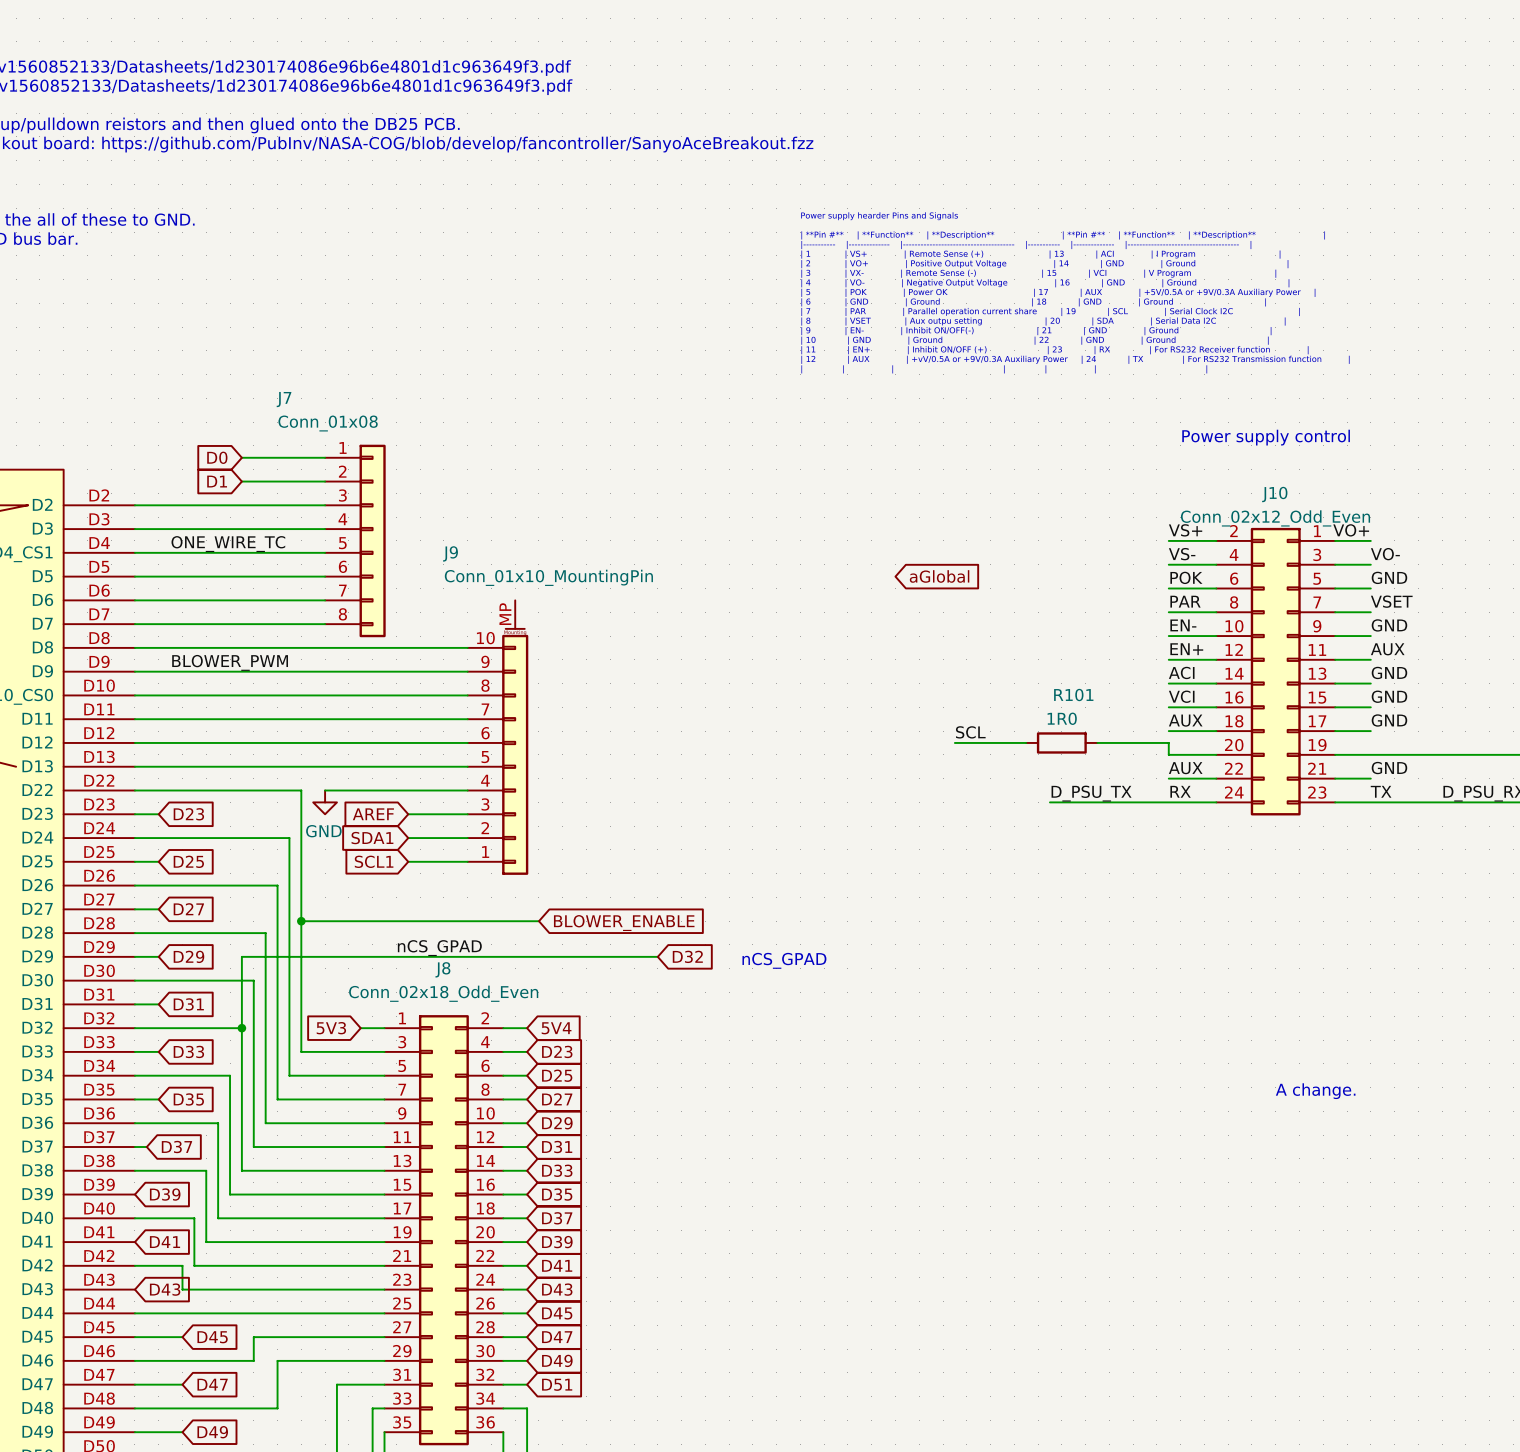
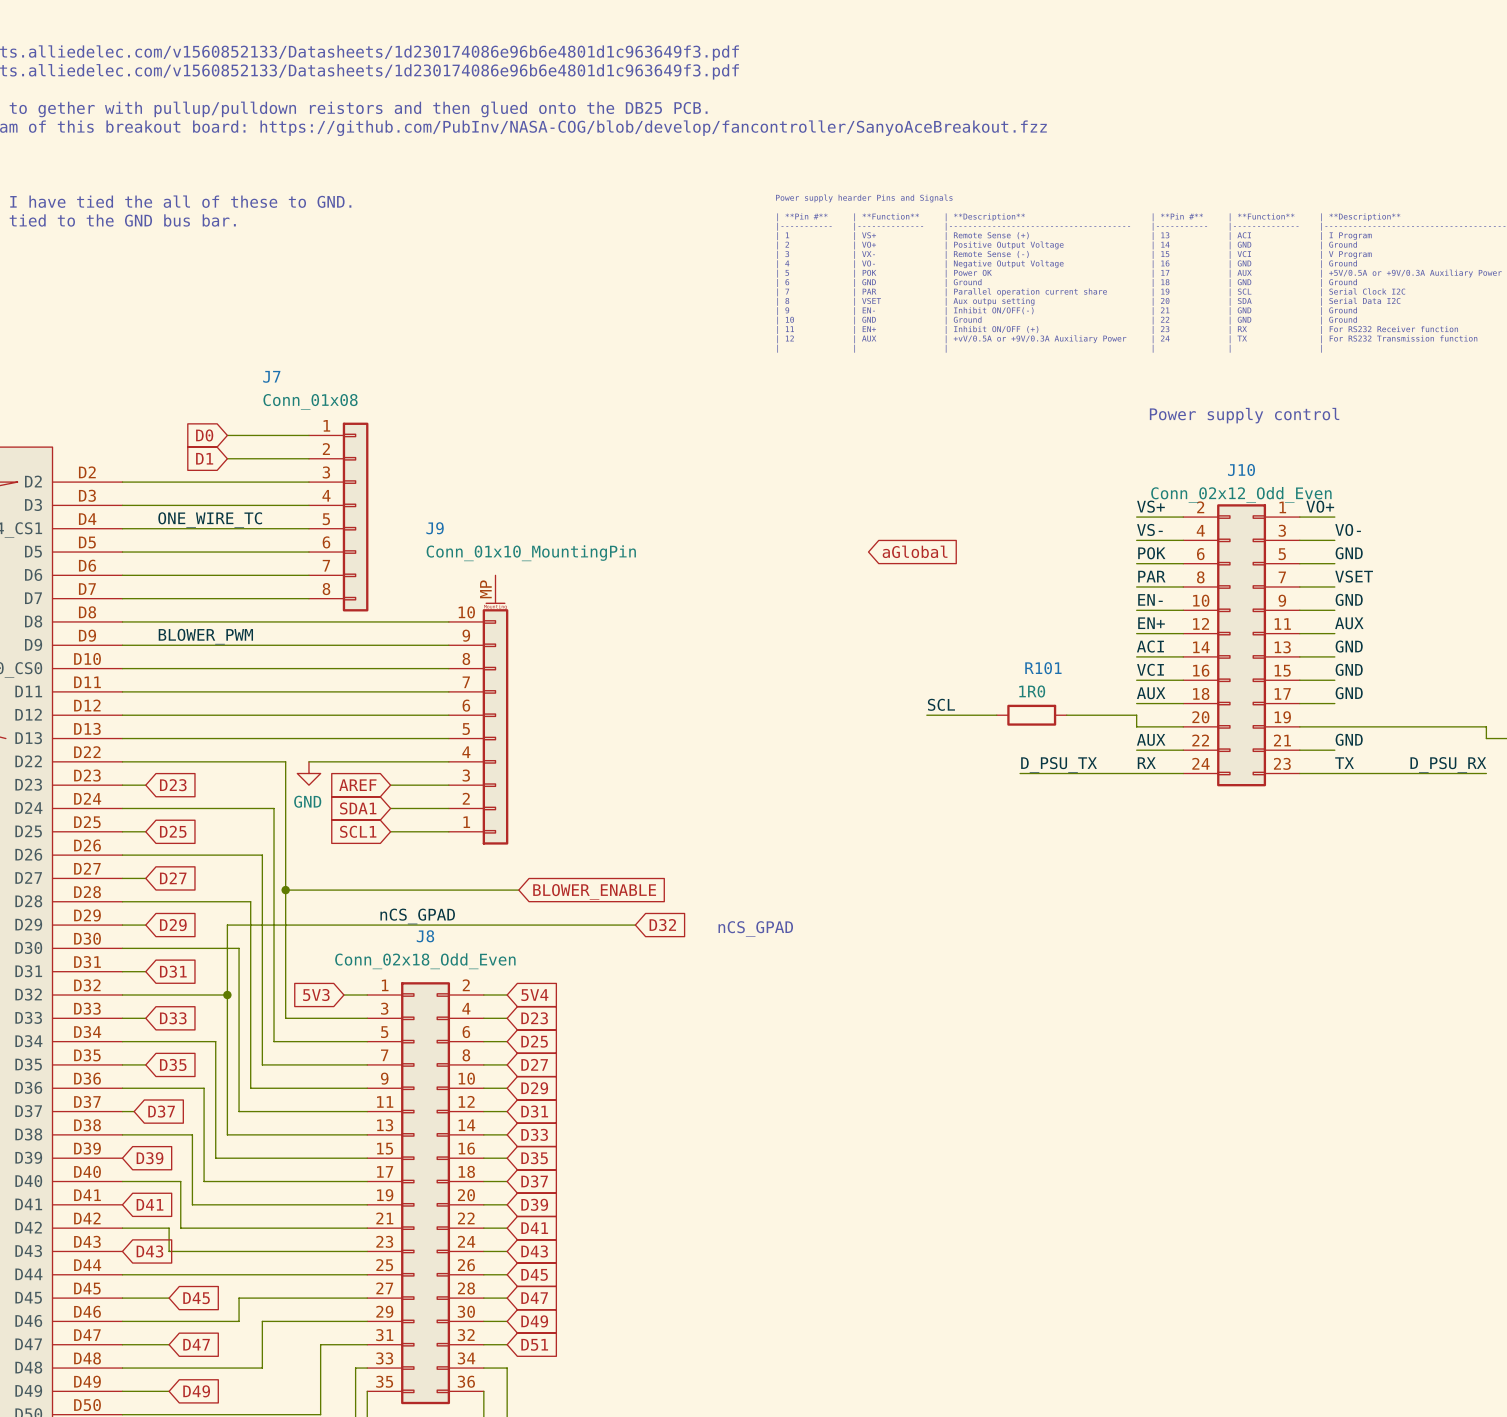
text: A change. (1315, 1091) -> none

